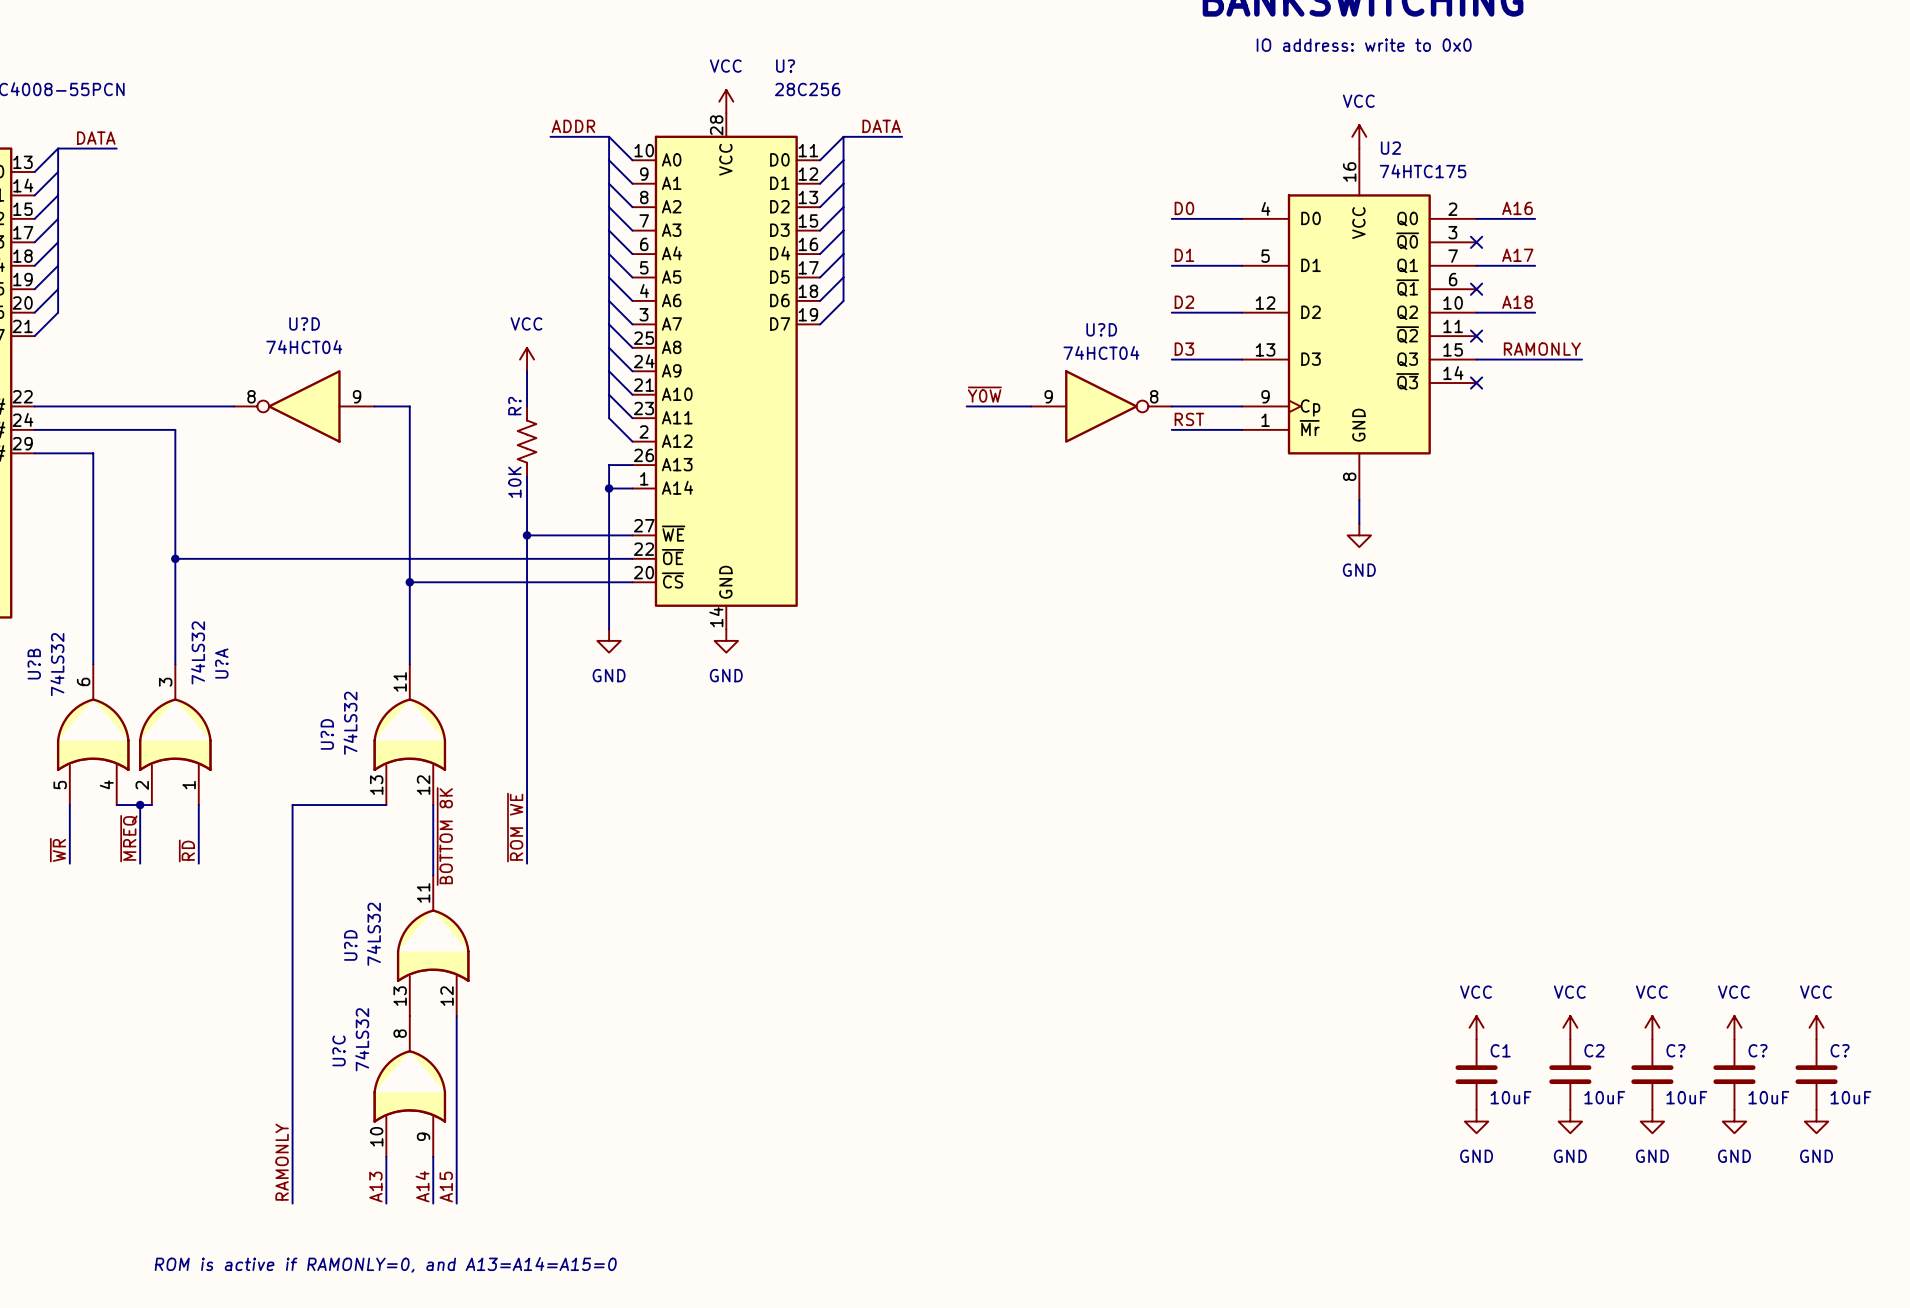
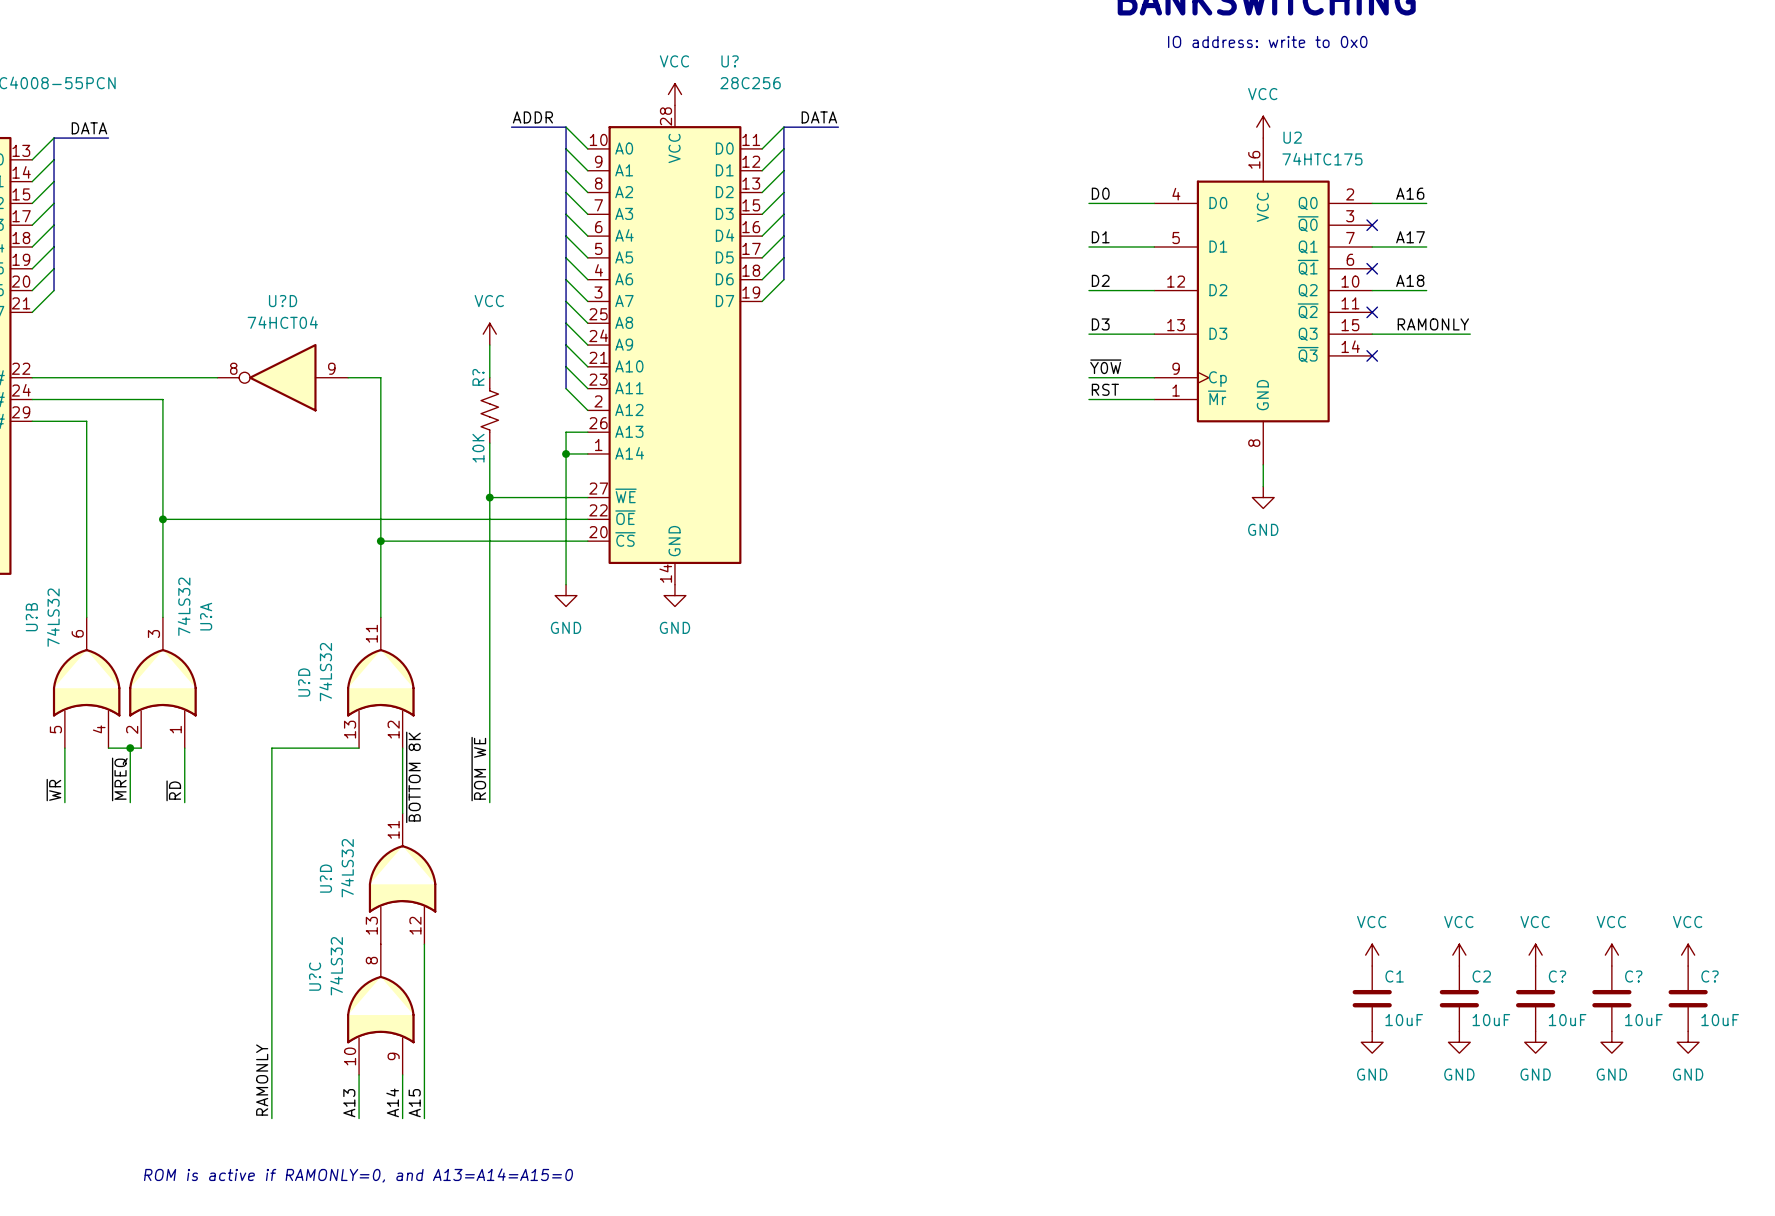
label position: ~{Y0W} (984, 394) -> ~{Y0W} (1105, 366)
wire: (966, 406) (1031, 406) -> none
U?D: 74HCT04 (1101, 406) -> none

